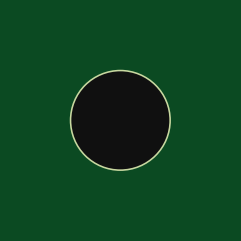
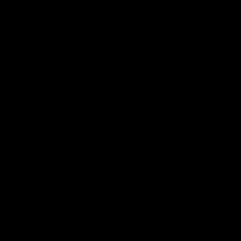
part: (120, 120) -> none

